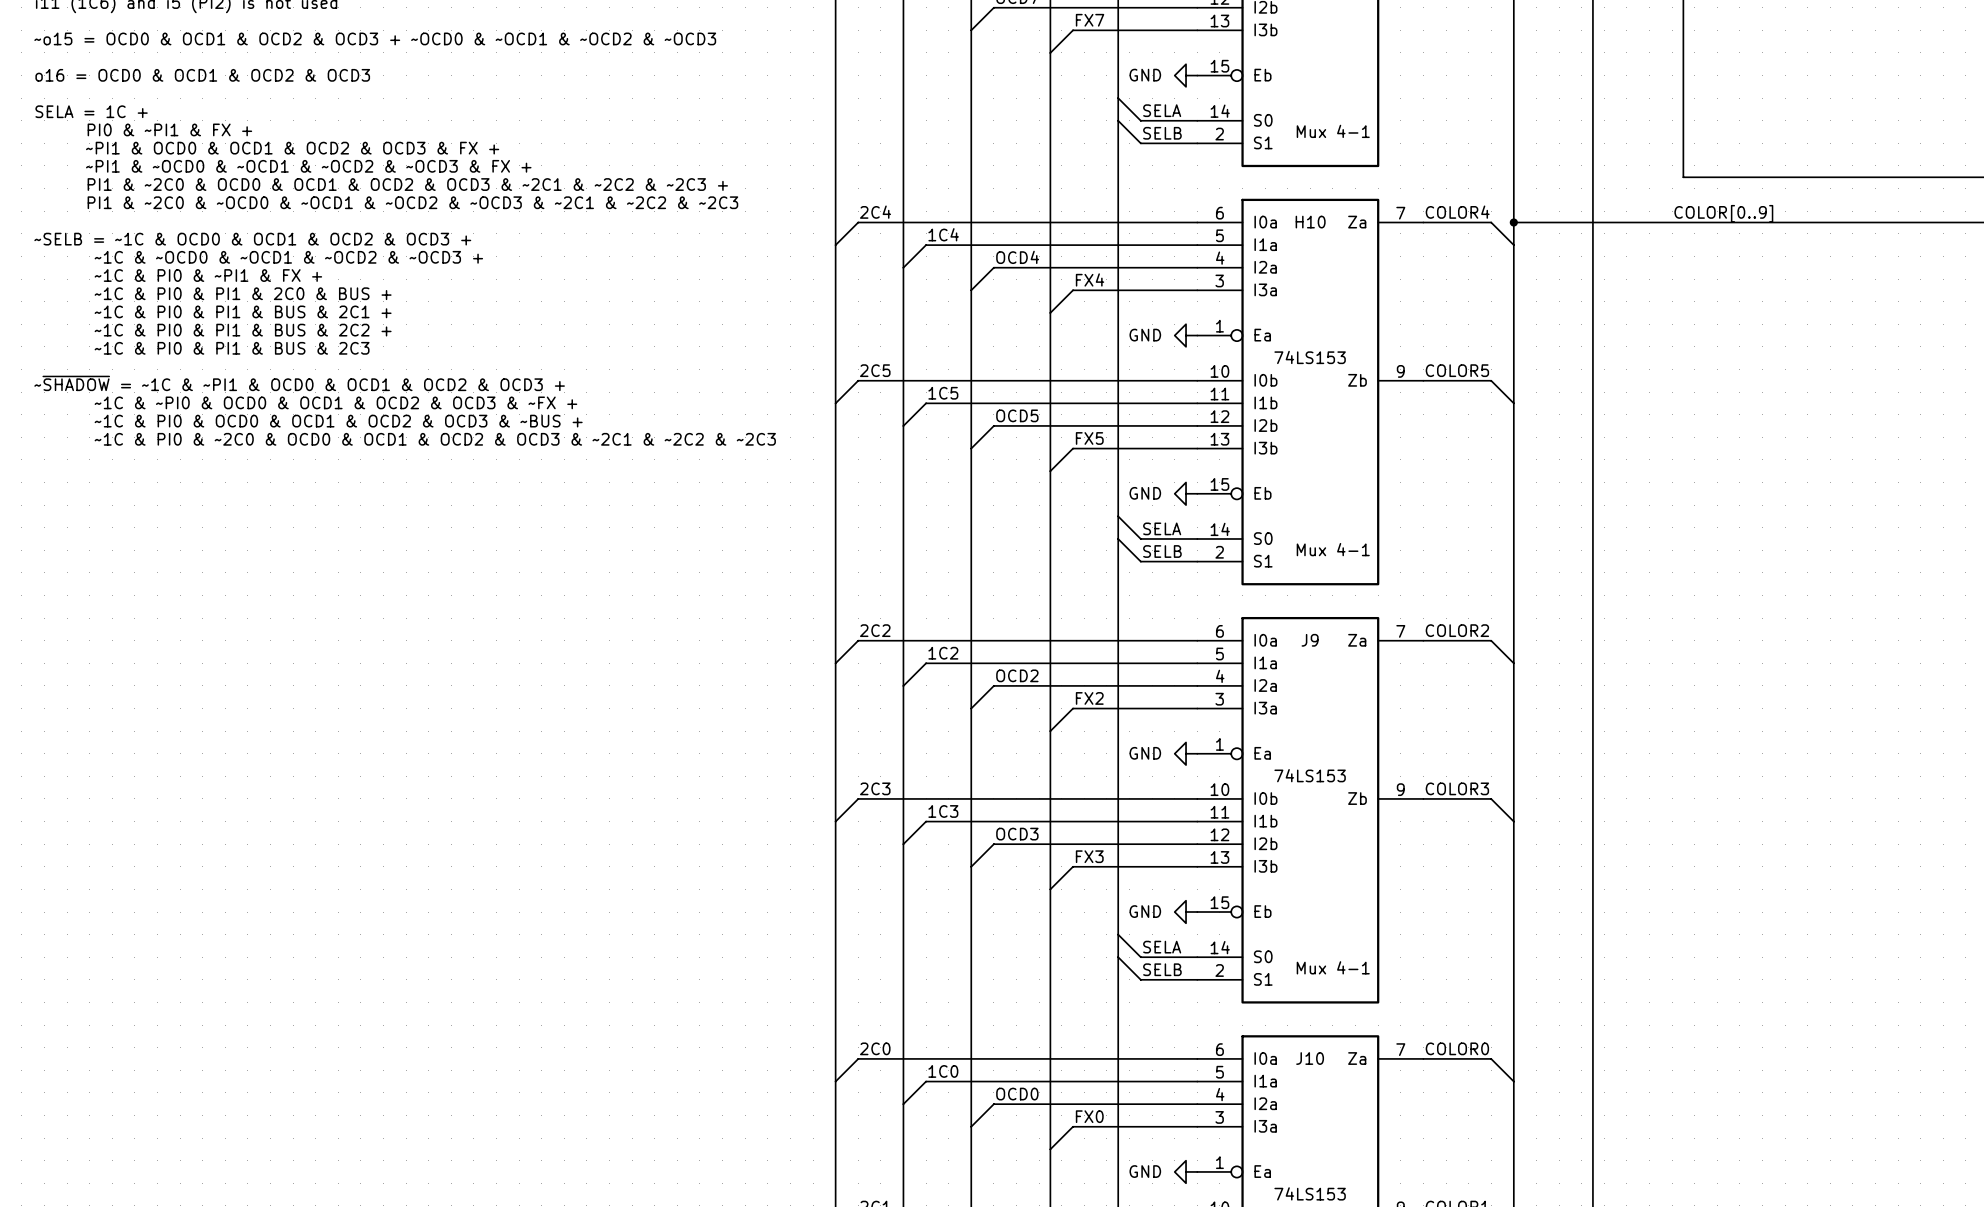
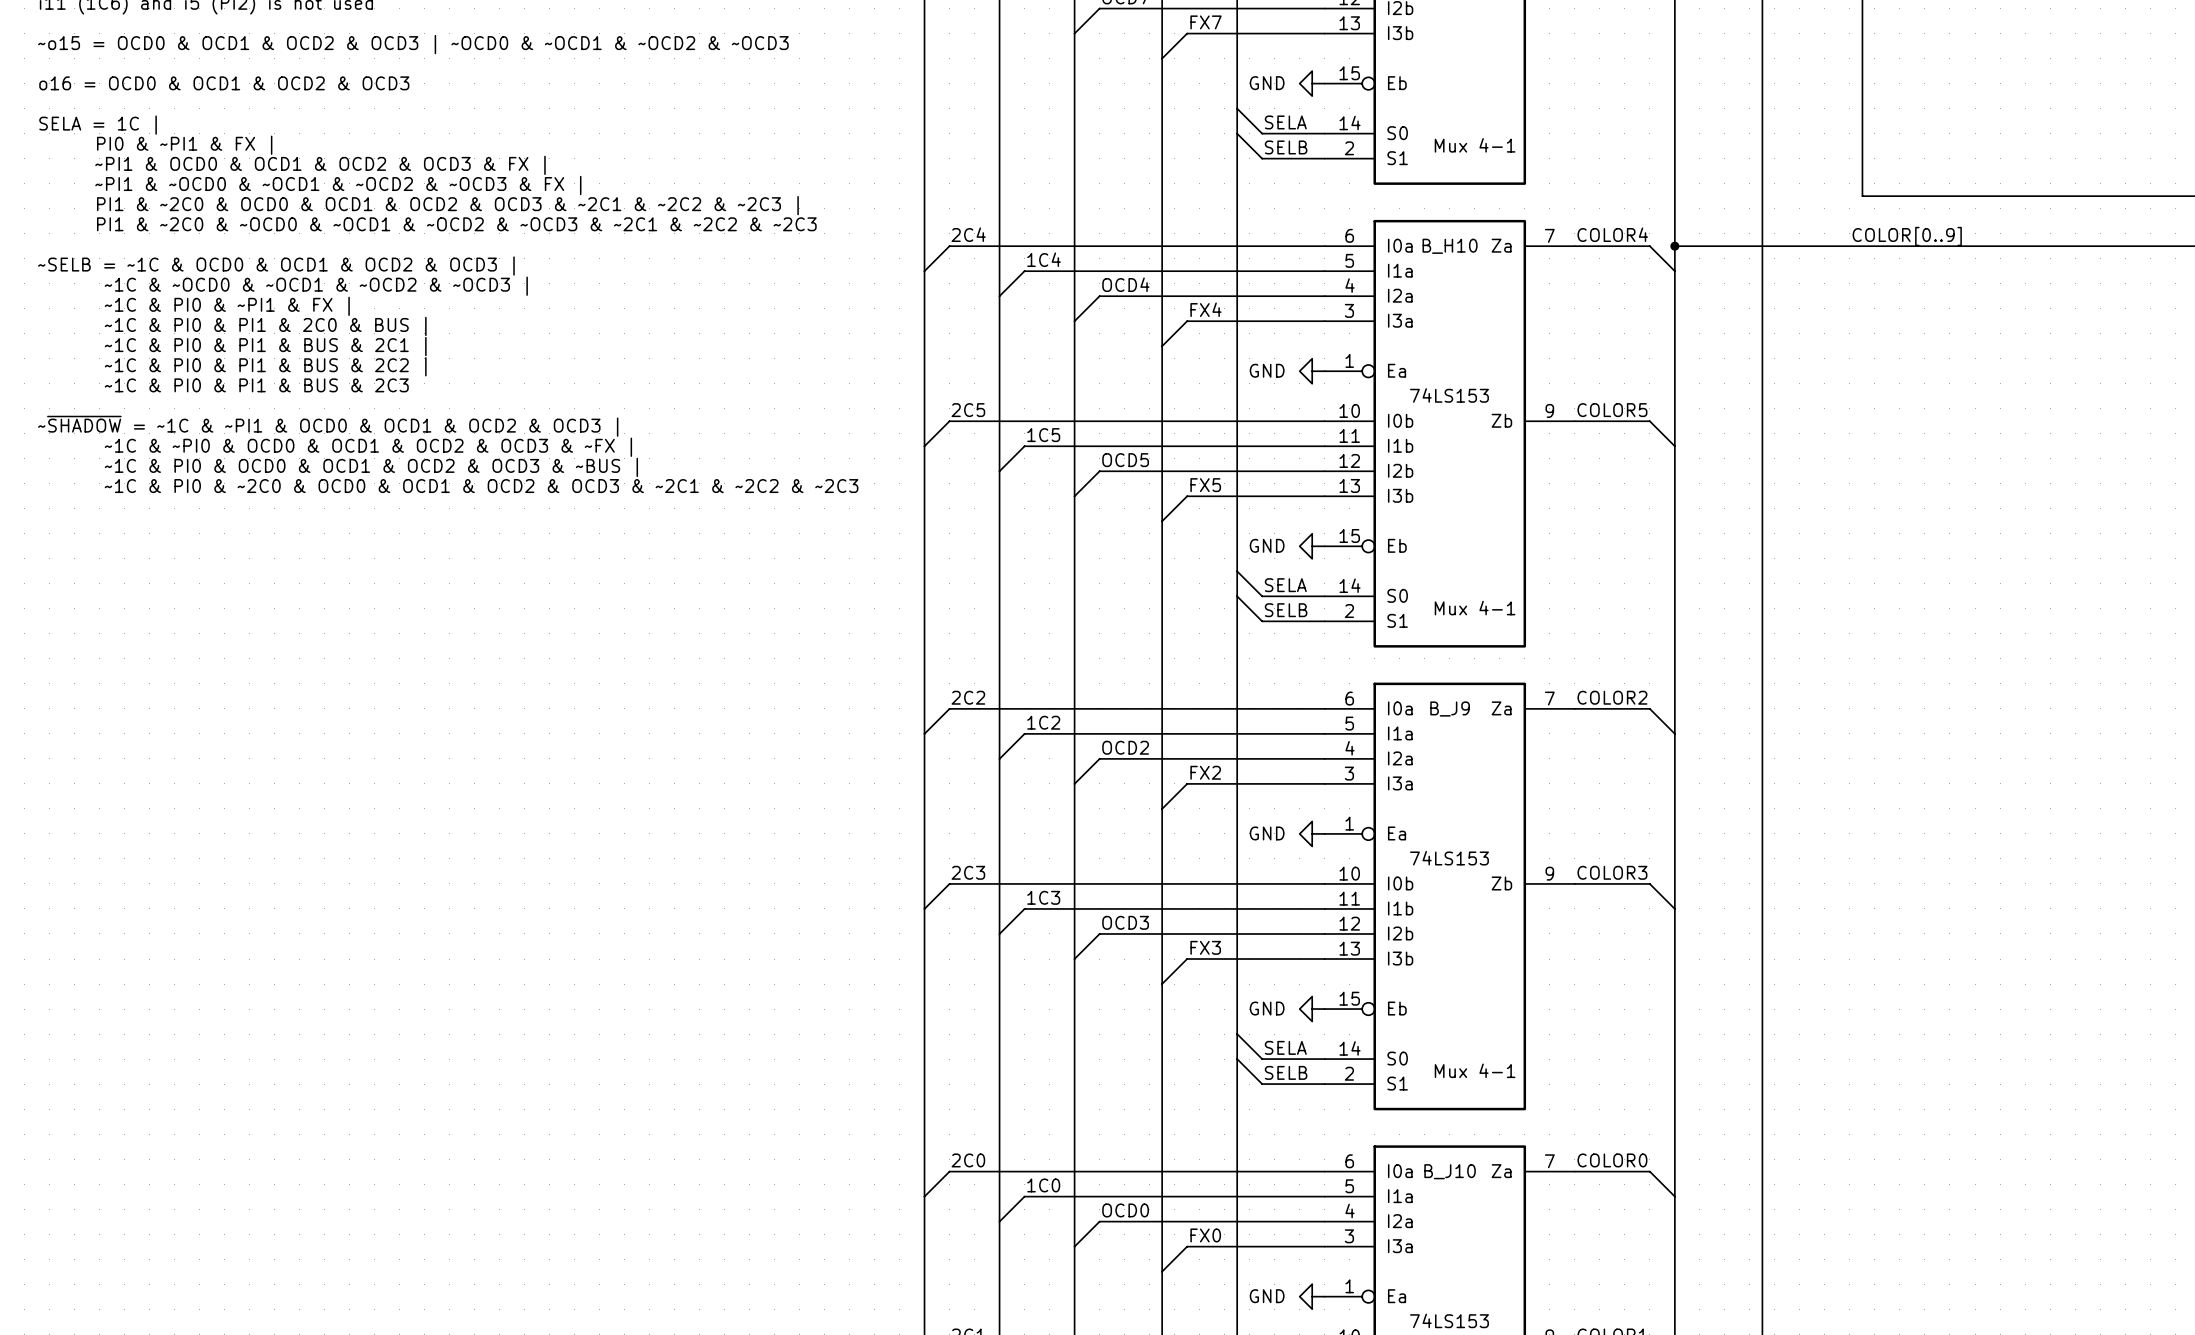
text: ~o15 = OCD0 & OCD1 & OCD2 & OCD3 + ~OCD0 & ~OCD1 & ~OCD2 & ~OCD3 (375, 38) -> ~o15 = OCD0 & OCD1 & OCD2 & OCD3 | ~OCD0 & ~OCD1 & ~OCD2 & ~OCD3 (413, 44)
text: SELA = 1C + (91, 111) -> SELA = 1C | (98, 125)
text: PI0 & ~PI1 & FX + (169, 129) -> PI0 & ~PI1 & FX | (184, 145)
text: ~PI1 & OCD0 & OCD1 & OCD2 & OCD3 & FX + (292, 148) -> ~PI1 & OCD0 & OCD1 & OCD2 & OCD3 & FX | (320, 165)
text: ~PI1 & ~OCD0 & ~OCD1 & ~OCD2 & ~OCD3 & FX + (308, 166) -> ~PI1 & ~OCD0 & ~OCD1 & ~OCD2 & ~OCD3 & FX | (338, 185)
text: PI1 & ~2C0 & OCD0 & OCD1 & OCD2 & OCD3 & ~2C1 & ~2C2 & ~2C3 + (407, 184) -> PI1 & ~2C0 & OCD0 & OCD1 & OCD2 & OCD3 & ~2C1 & ~2C2 & ~2C3 | (447, 205)
H10 name: H10 (1310, 222) -> B_H10 (1450, 246)
text: ~SELB = ~1C & OCD0 & OCD1 & OCD2 & OCD3 + (252, 239) -> ~SELB = ~1C & OCD0 & OCD1 & OCD2 & OCD3 | (276, 266)
text: ~1C & ~OCD0 & ~OCD1 & ~OCD2 & ~OCD3 + (288, 257) -> ~1C & ~OCD0 & ~OCD1 & ~OCD2 & ~OCD3 | (316, 286)
text: ~1C & PI0 & ~PI1 & FX + (208, 275) -> ~1C & PI0 & ~PI1 & FX | (227, 306)
text: ~1C & PI0 & PI1 & 2C0 & BUS + (243, 293) -> ~1C & PI0 & PI1 & 2C0 & BUS | (265, 326)
text: ~1C & PI0 & PI1 & BUS & 2C1 + (243, 311) -> ~1C & PI0 & PI1 & BUS & 2C1 | (265, 346)
text: ~1C & PI0 & PI1 & BUS & 2C2 + (243, 330) -> ~1C & PI0 & PI1 & BUS & 2C2 | (265, 366)
text: ~~{SHADOW} = ~1C & ~PI1 & OCD0 & OCD1 & OCD2 & OCD3 + (299, 383) -> ~~{SHADOW} = ~1C & ~PI1 & OCD0 & OCD1 & OCD2 & OCD3 | (328, 426)
text: ~1C & ~PI0 & OCD0 & OCD1 & OCD2 & OCD3 & ~FX + (335, 402) -> ~1C & ~PI0 & OCD0 & OCD1 & OCD2 & OCD3 & ~FX | (368, 447)
text: ~1C & PI0 & OCD0 & OCD1 & OCD2 & OCD3 & ~BUS + (338, 421) -> ~1C & PI0 & OCD0 & OCD1 & OCD2 & OCD3 & ~BUS | (371, 467)
J9 name: J9 (1310, 640) -> B_J9 (1450, 709)
J10 name: J10 (1310, 1058) -> B_J10 (1450, 1171)

